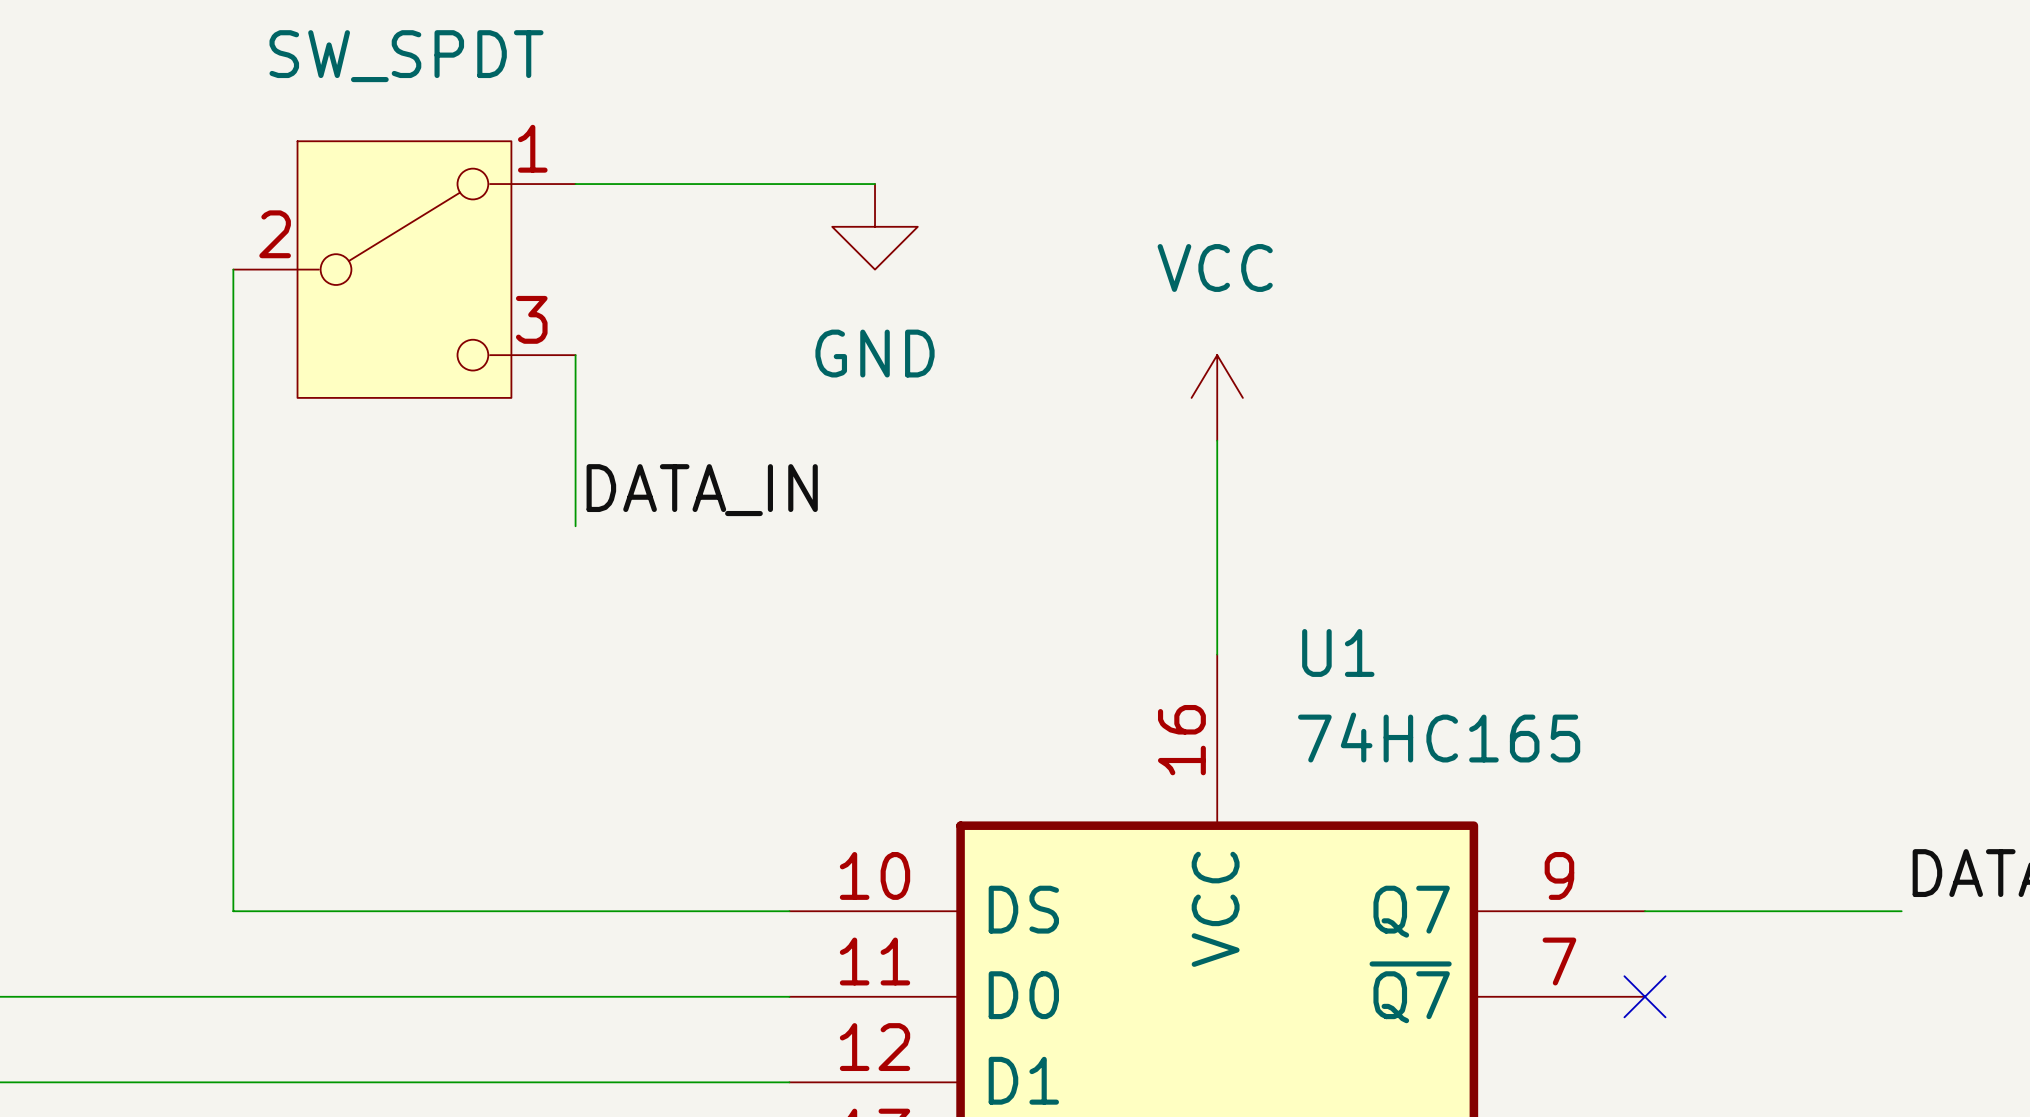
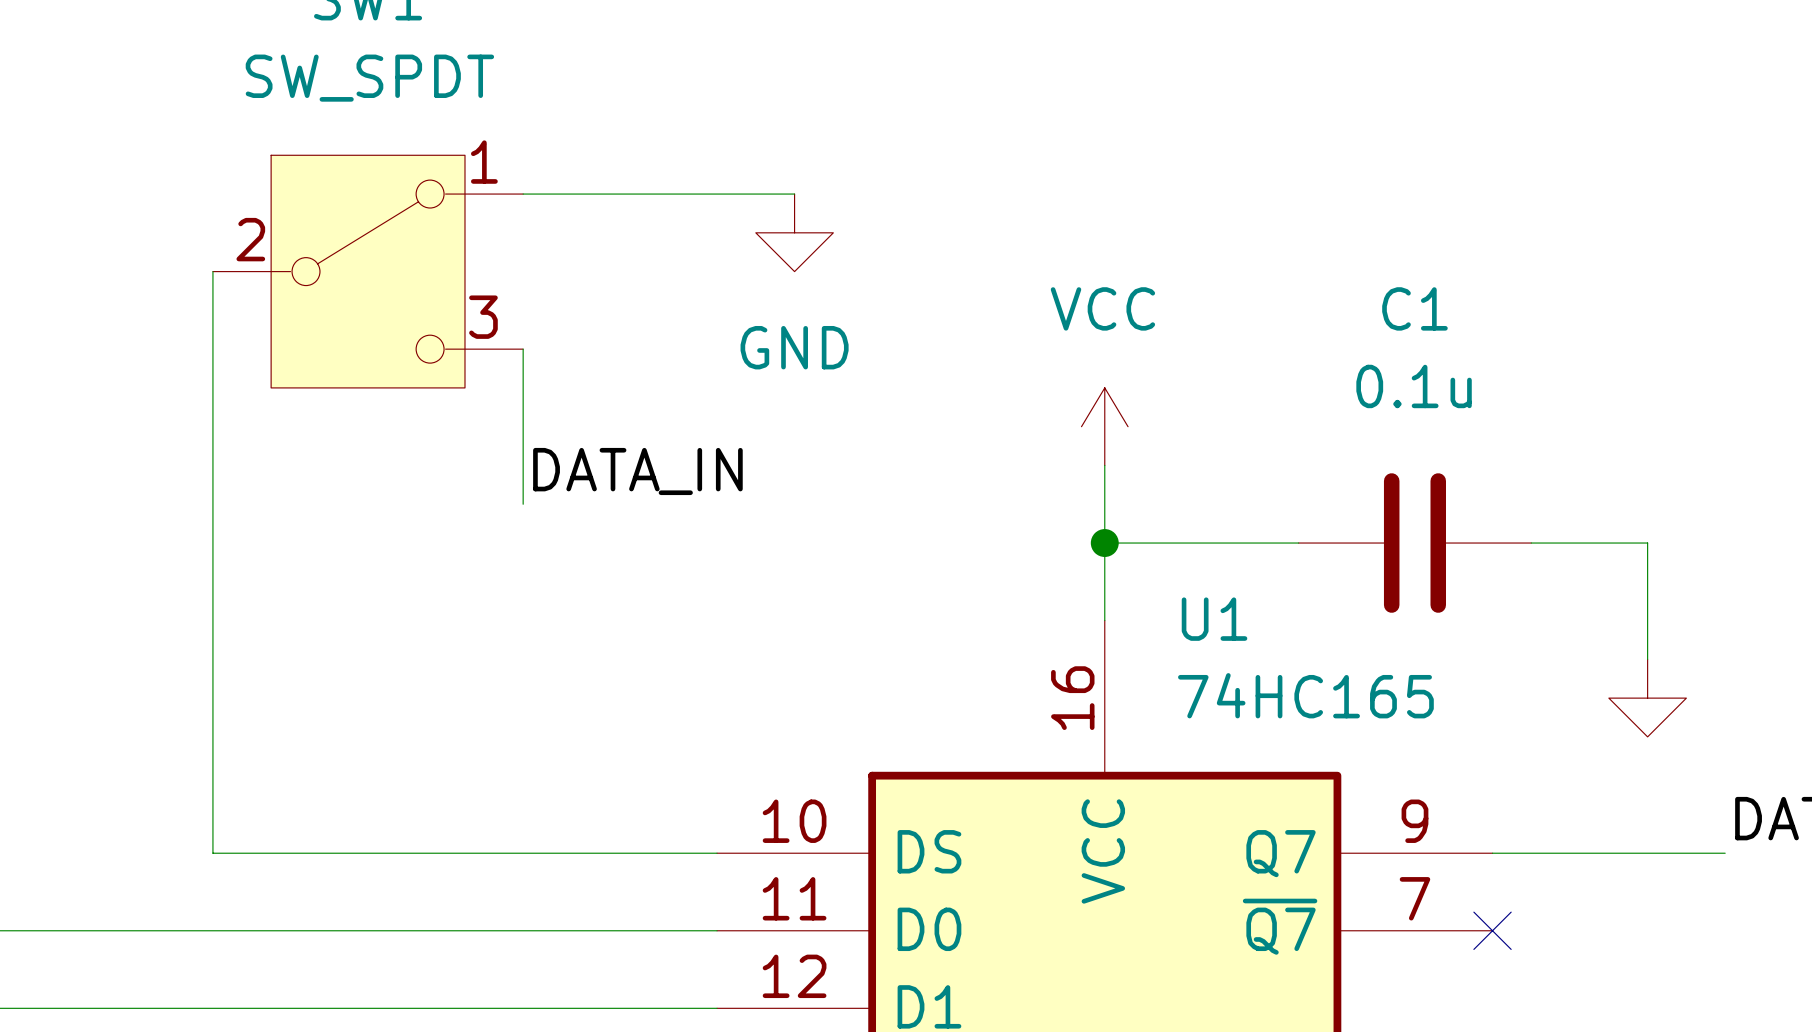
power symbol position: VCC (1217, 397) -> VCC (1104, 426)
wire: none -> (1104, 543) (1298, 543)
junction: none -> (1104, 543)
C1: none -> 0.1u (1414, 543)
wire: none -> (1531, 543) (1647, 543) (1647, 659)
power symbol: none -> (1647, 698)

